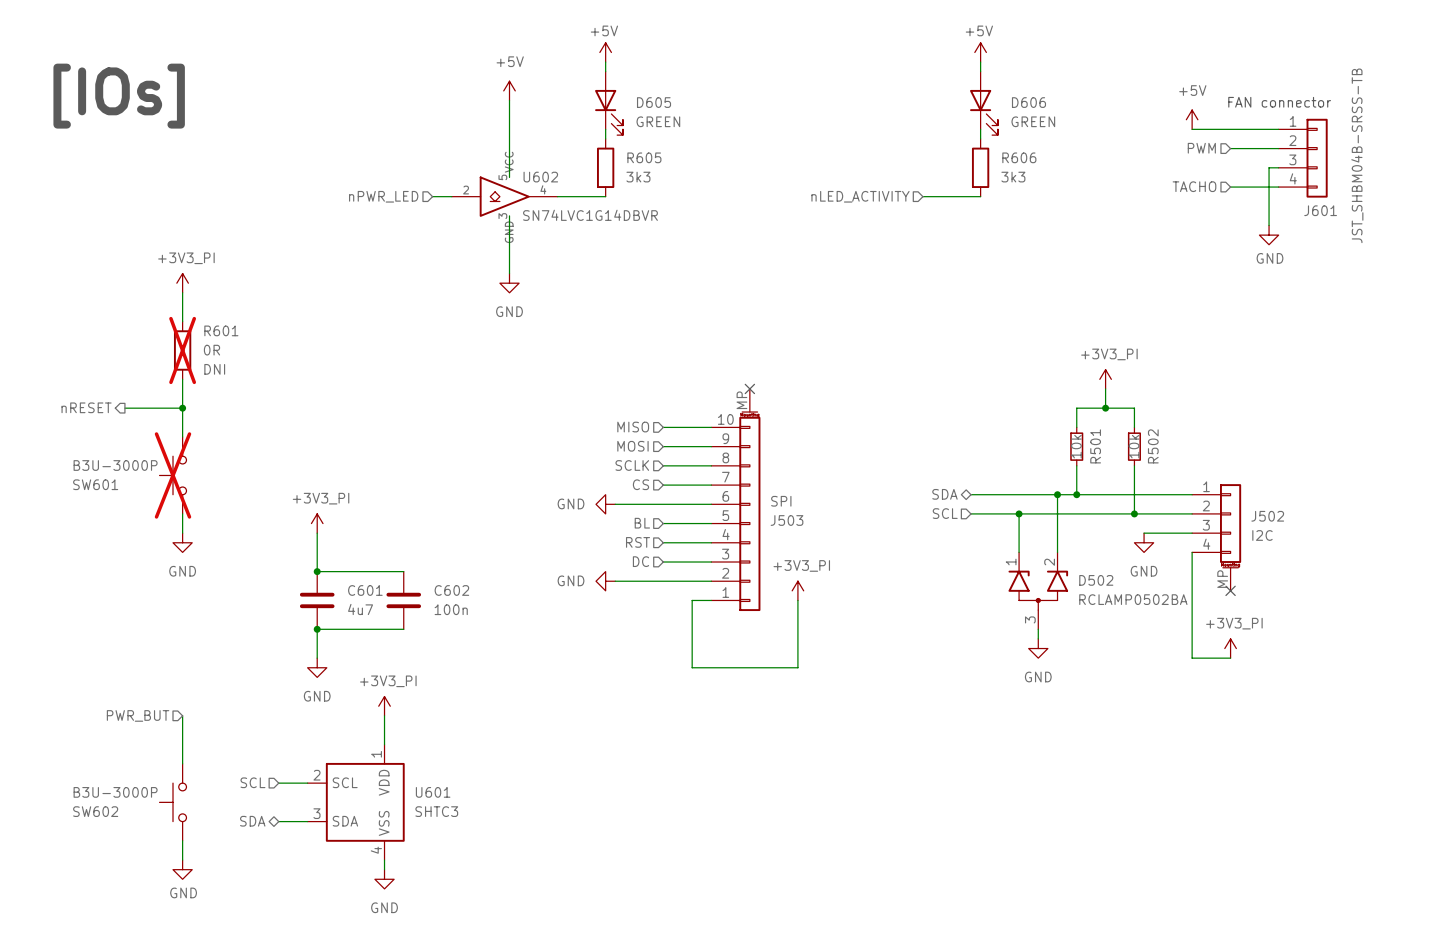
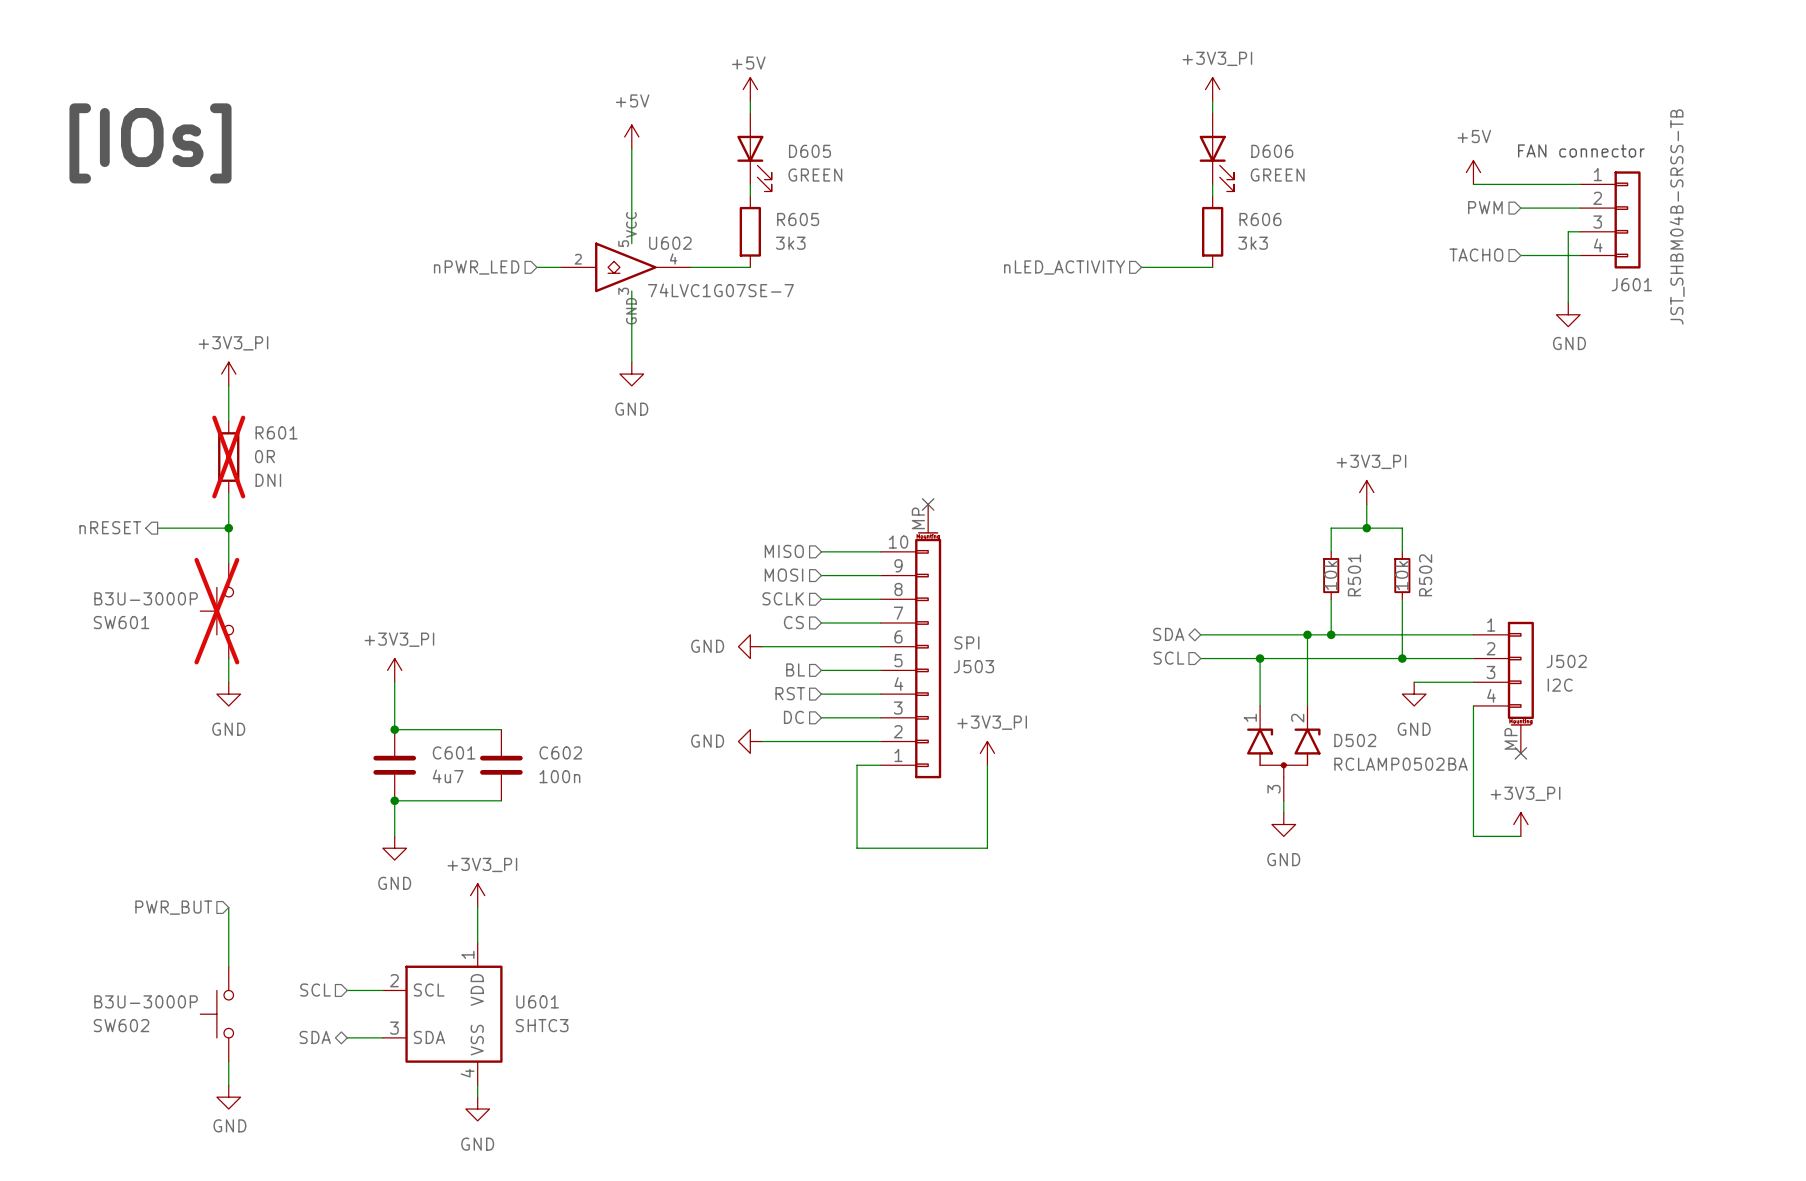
power symbol: +5V (980, 52) -> +3V3_PI (1212, 89)
U602 value: SN74LVC1G14DBVR (590, 215) -> 74LVC1G07SE-7 (720, 290)

